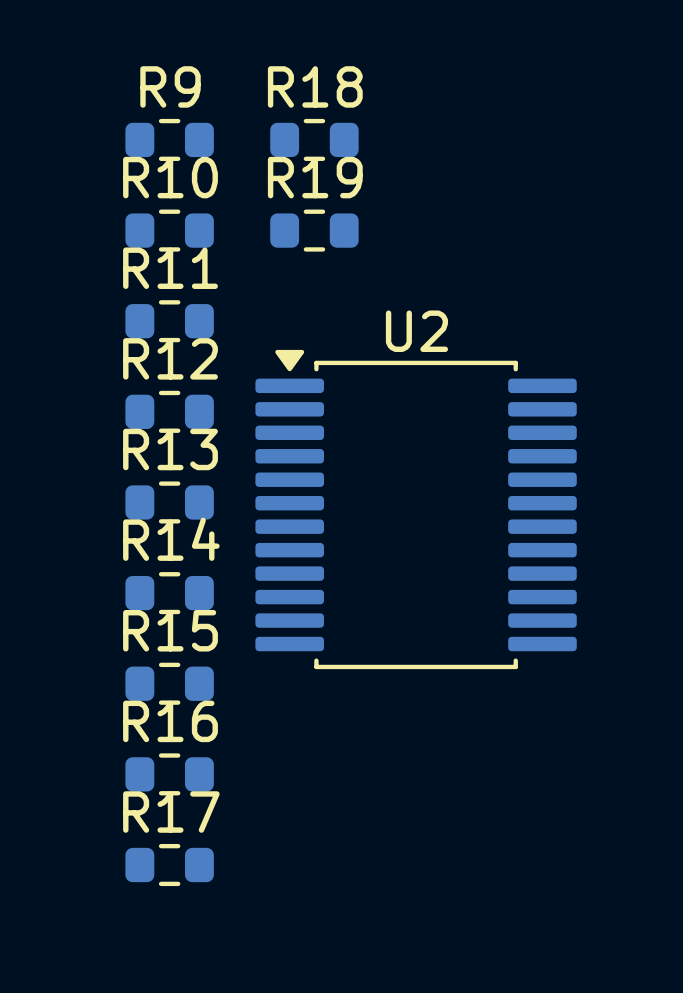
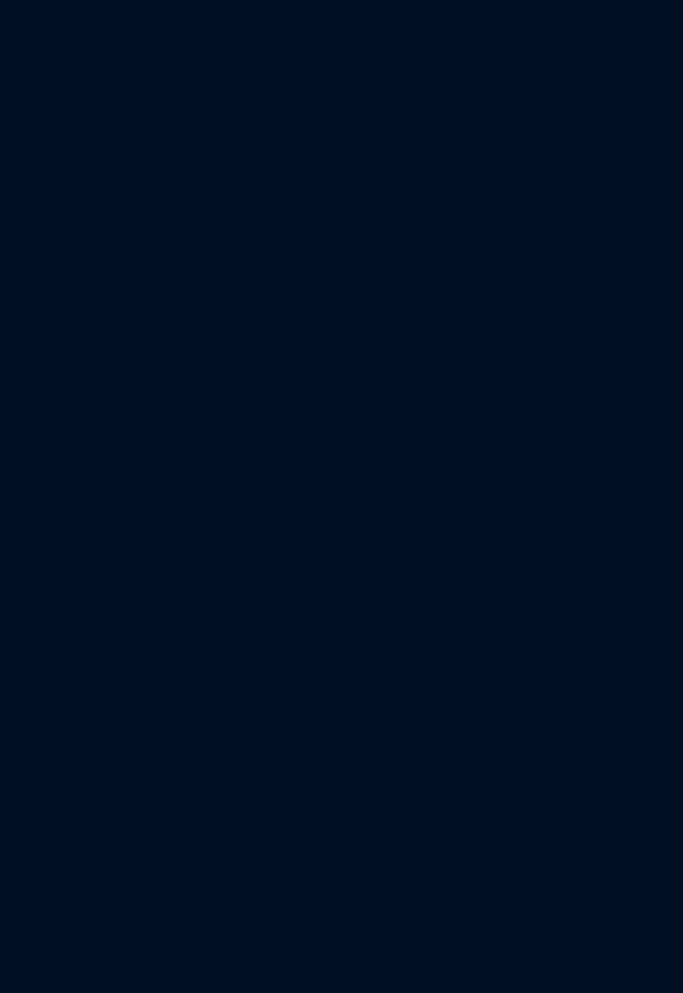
R9: (169, 139) -> none
R18: (314, 139) -> none
R10: (169, 230) -> none
R19: (314, 230) -> none
R11: (169, 321) -> none
R12: (169, 411) -> none
R13: (169, 502) -> none
U2: (416, 509) -> none
R14: (169, 593) -> none
R15: (169, 683) -> none
R16: (169, 774) -> none
R17: (169, 865) -> none

